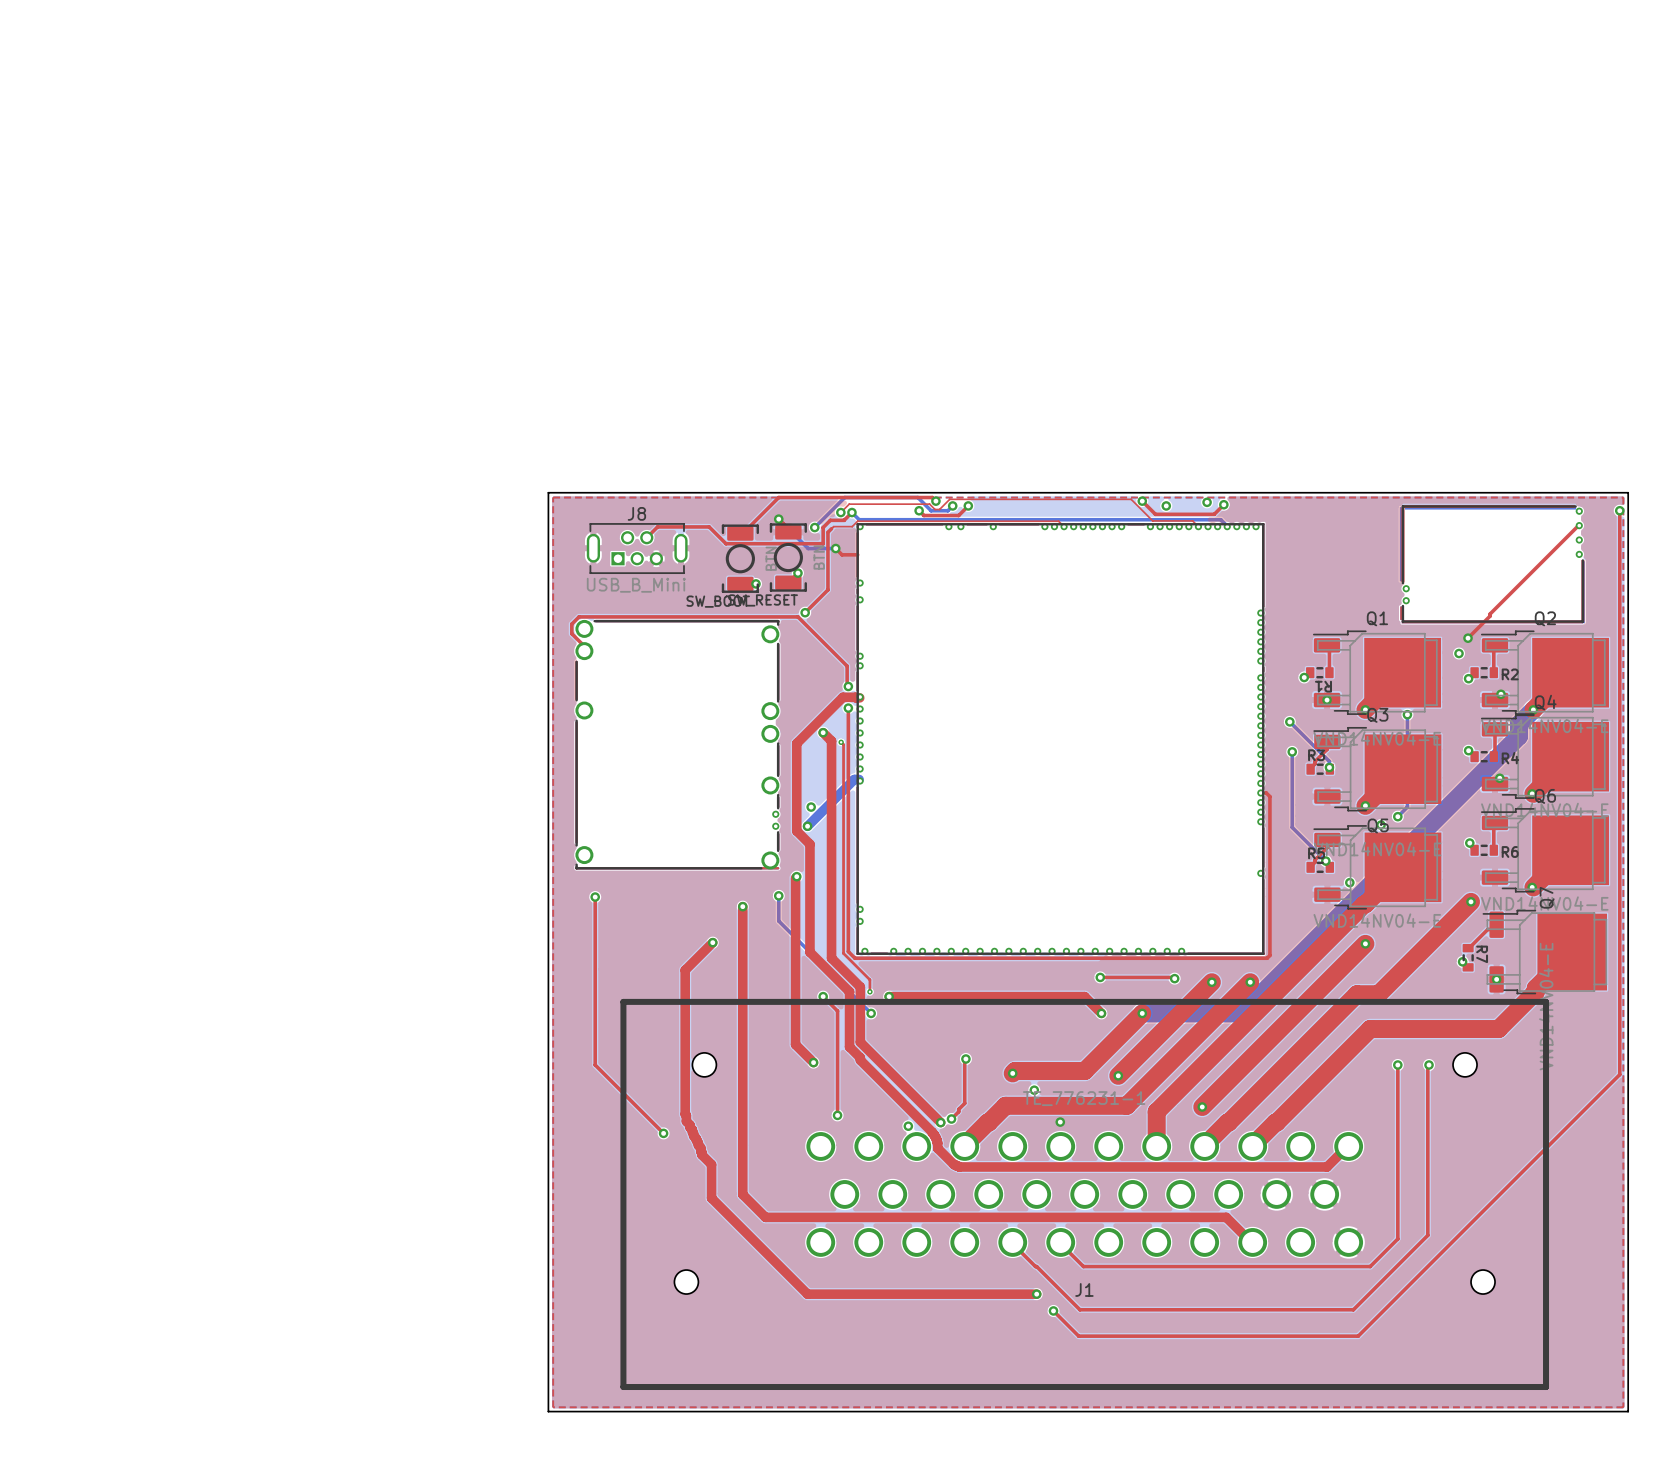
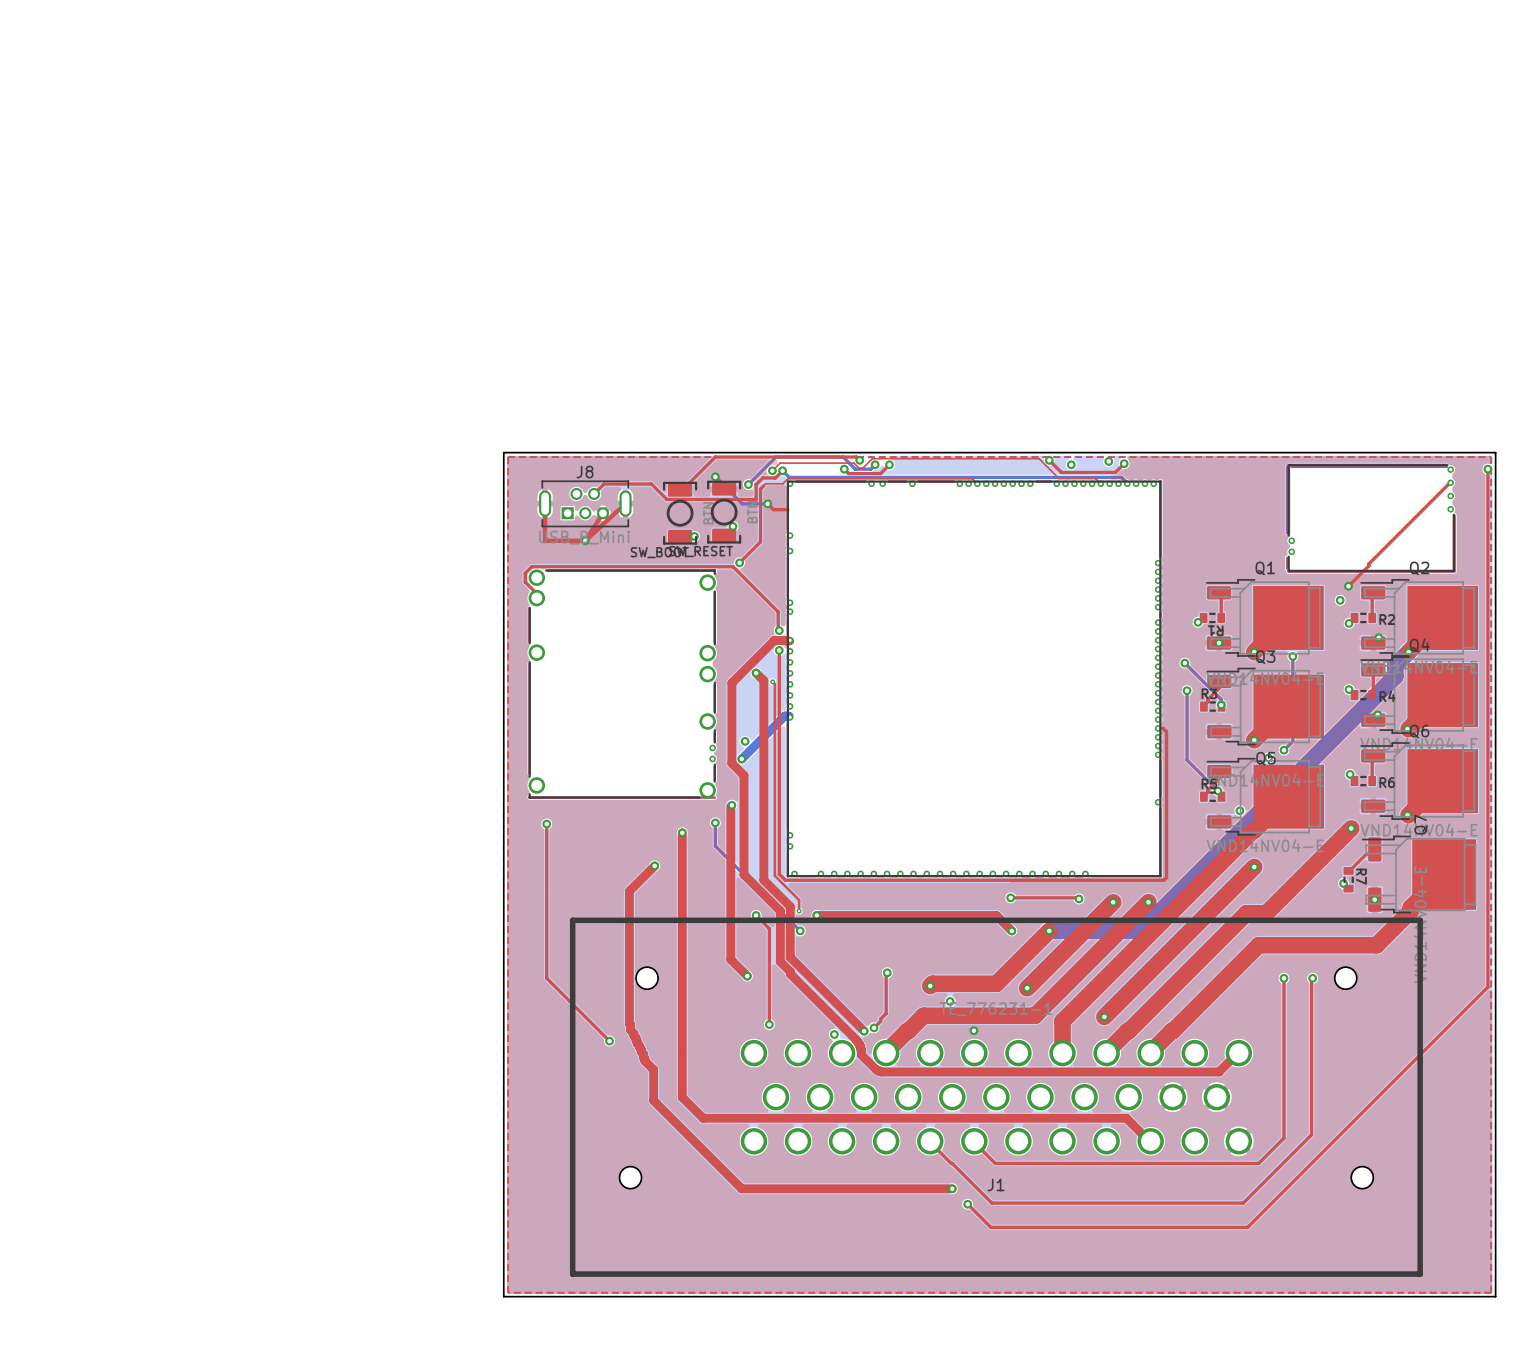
top track: none -> (545, 503) (545, 540) (585, 540)
top track: none -> (625, 503) (585, 540)
top track: none -> (602, 513) (585, 540)
via: none -> (585, 540)

